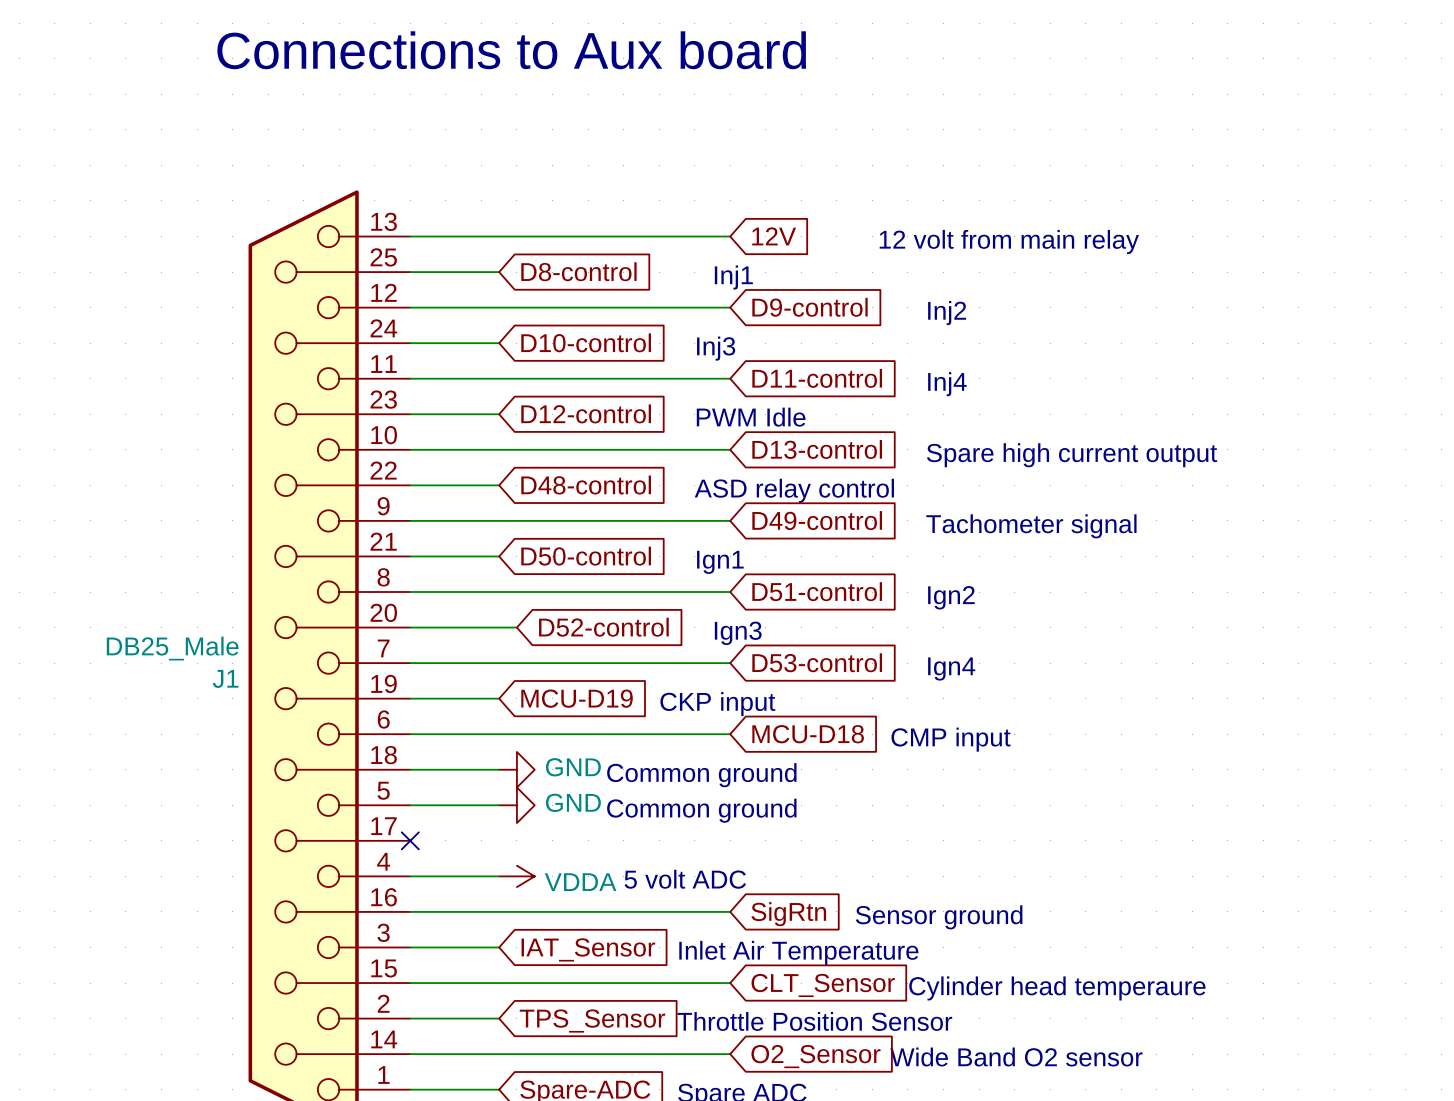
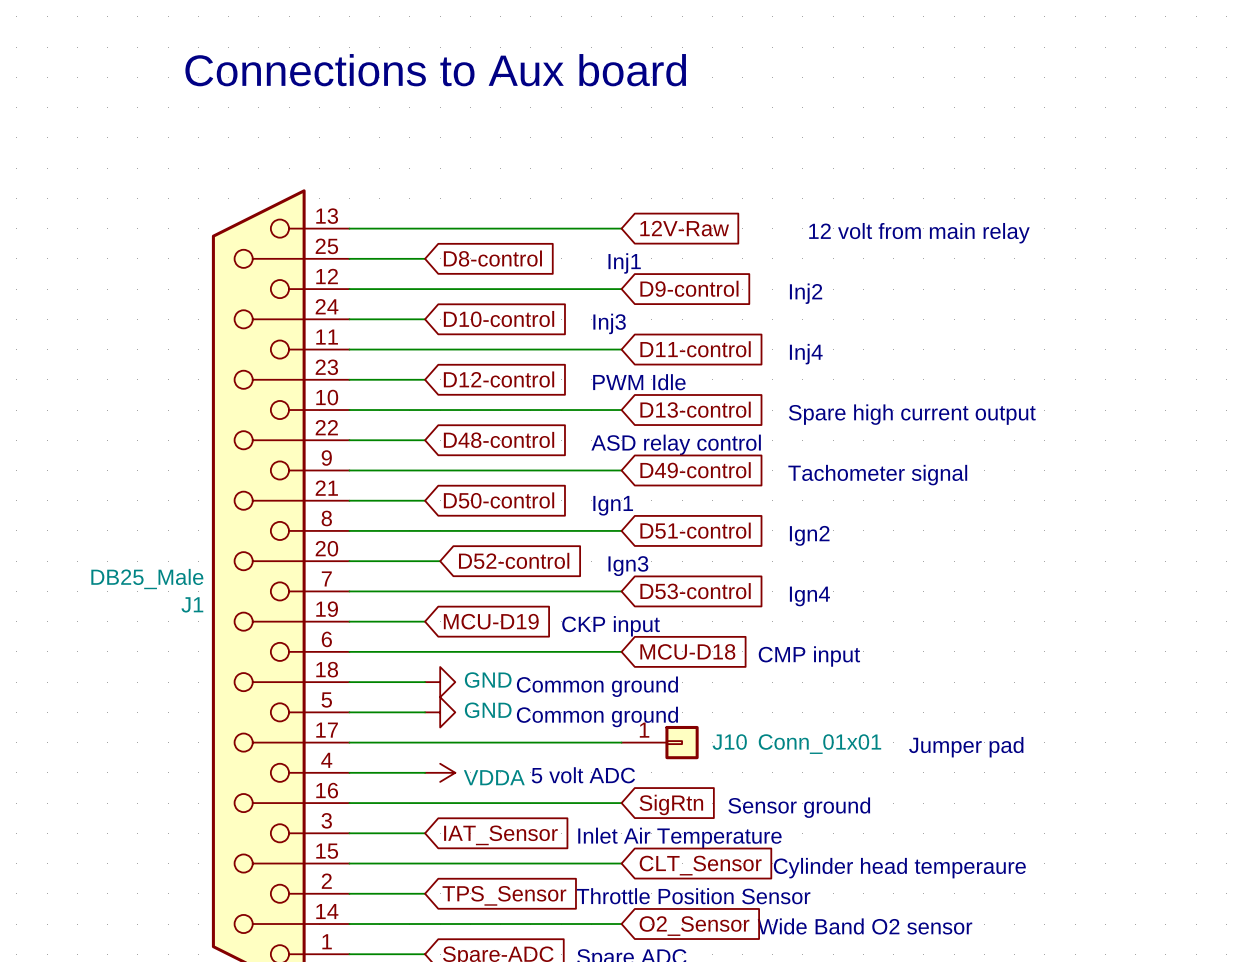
global label: 12V (774, 236) -> 12V-Raw (684, 228)
text position: 12 volt from main relay (1009, 241) -> 12 volt from main relay (919, 233)
wire: none -> (349, 742) (621, 742)
no-connect mark: (410, 840) -> none
J10: none -> Conn_01x01 (660, 742)
text: none -> Jumper pad (966, 747)

